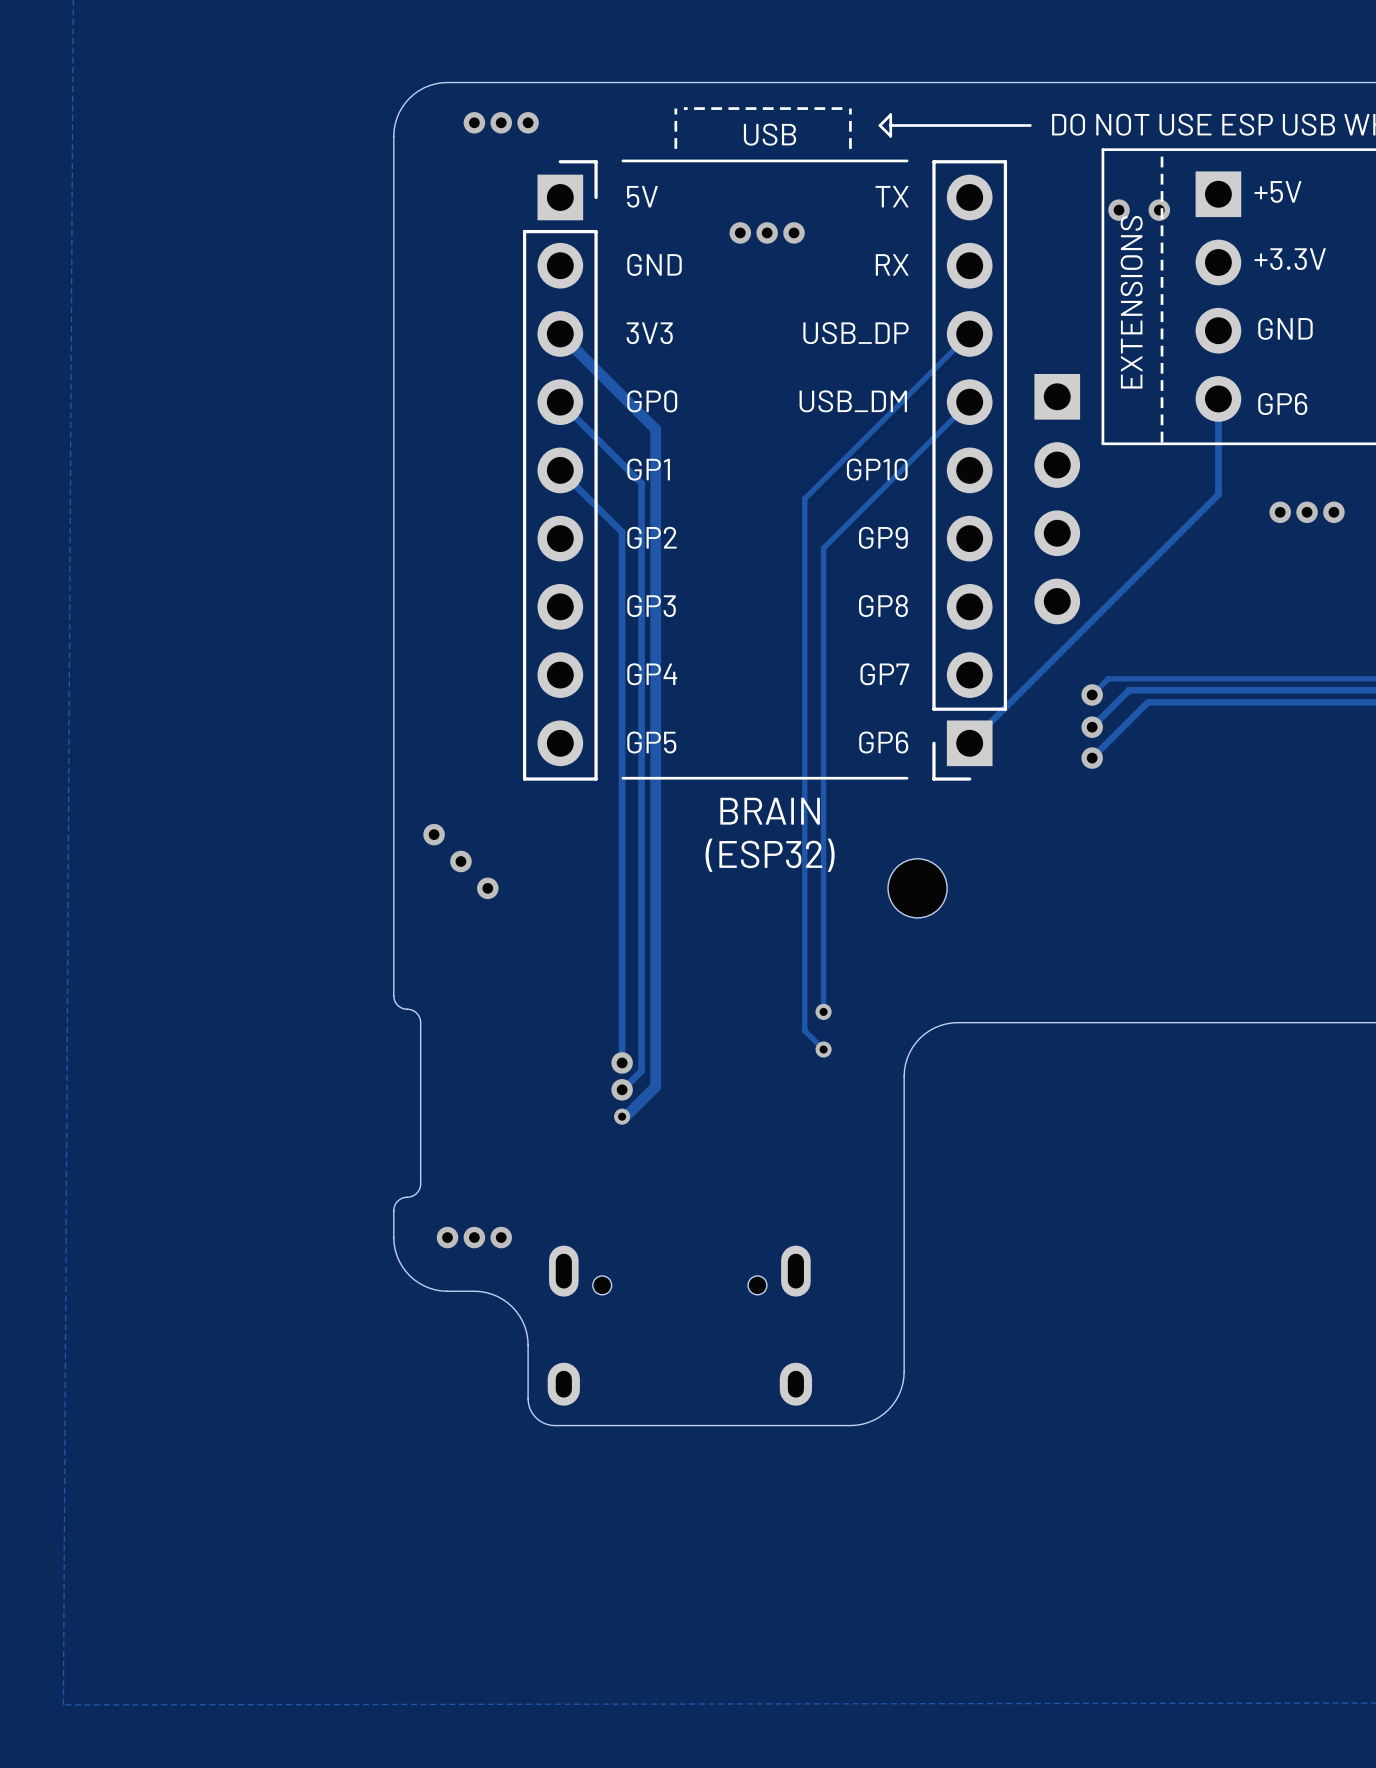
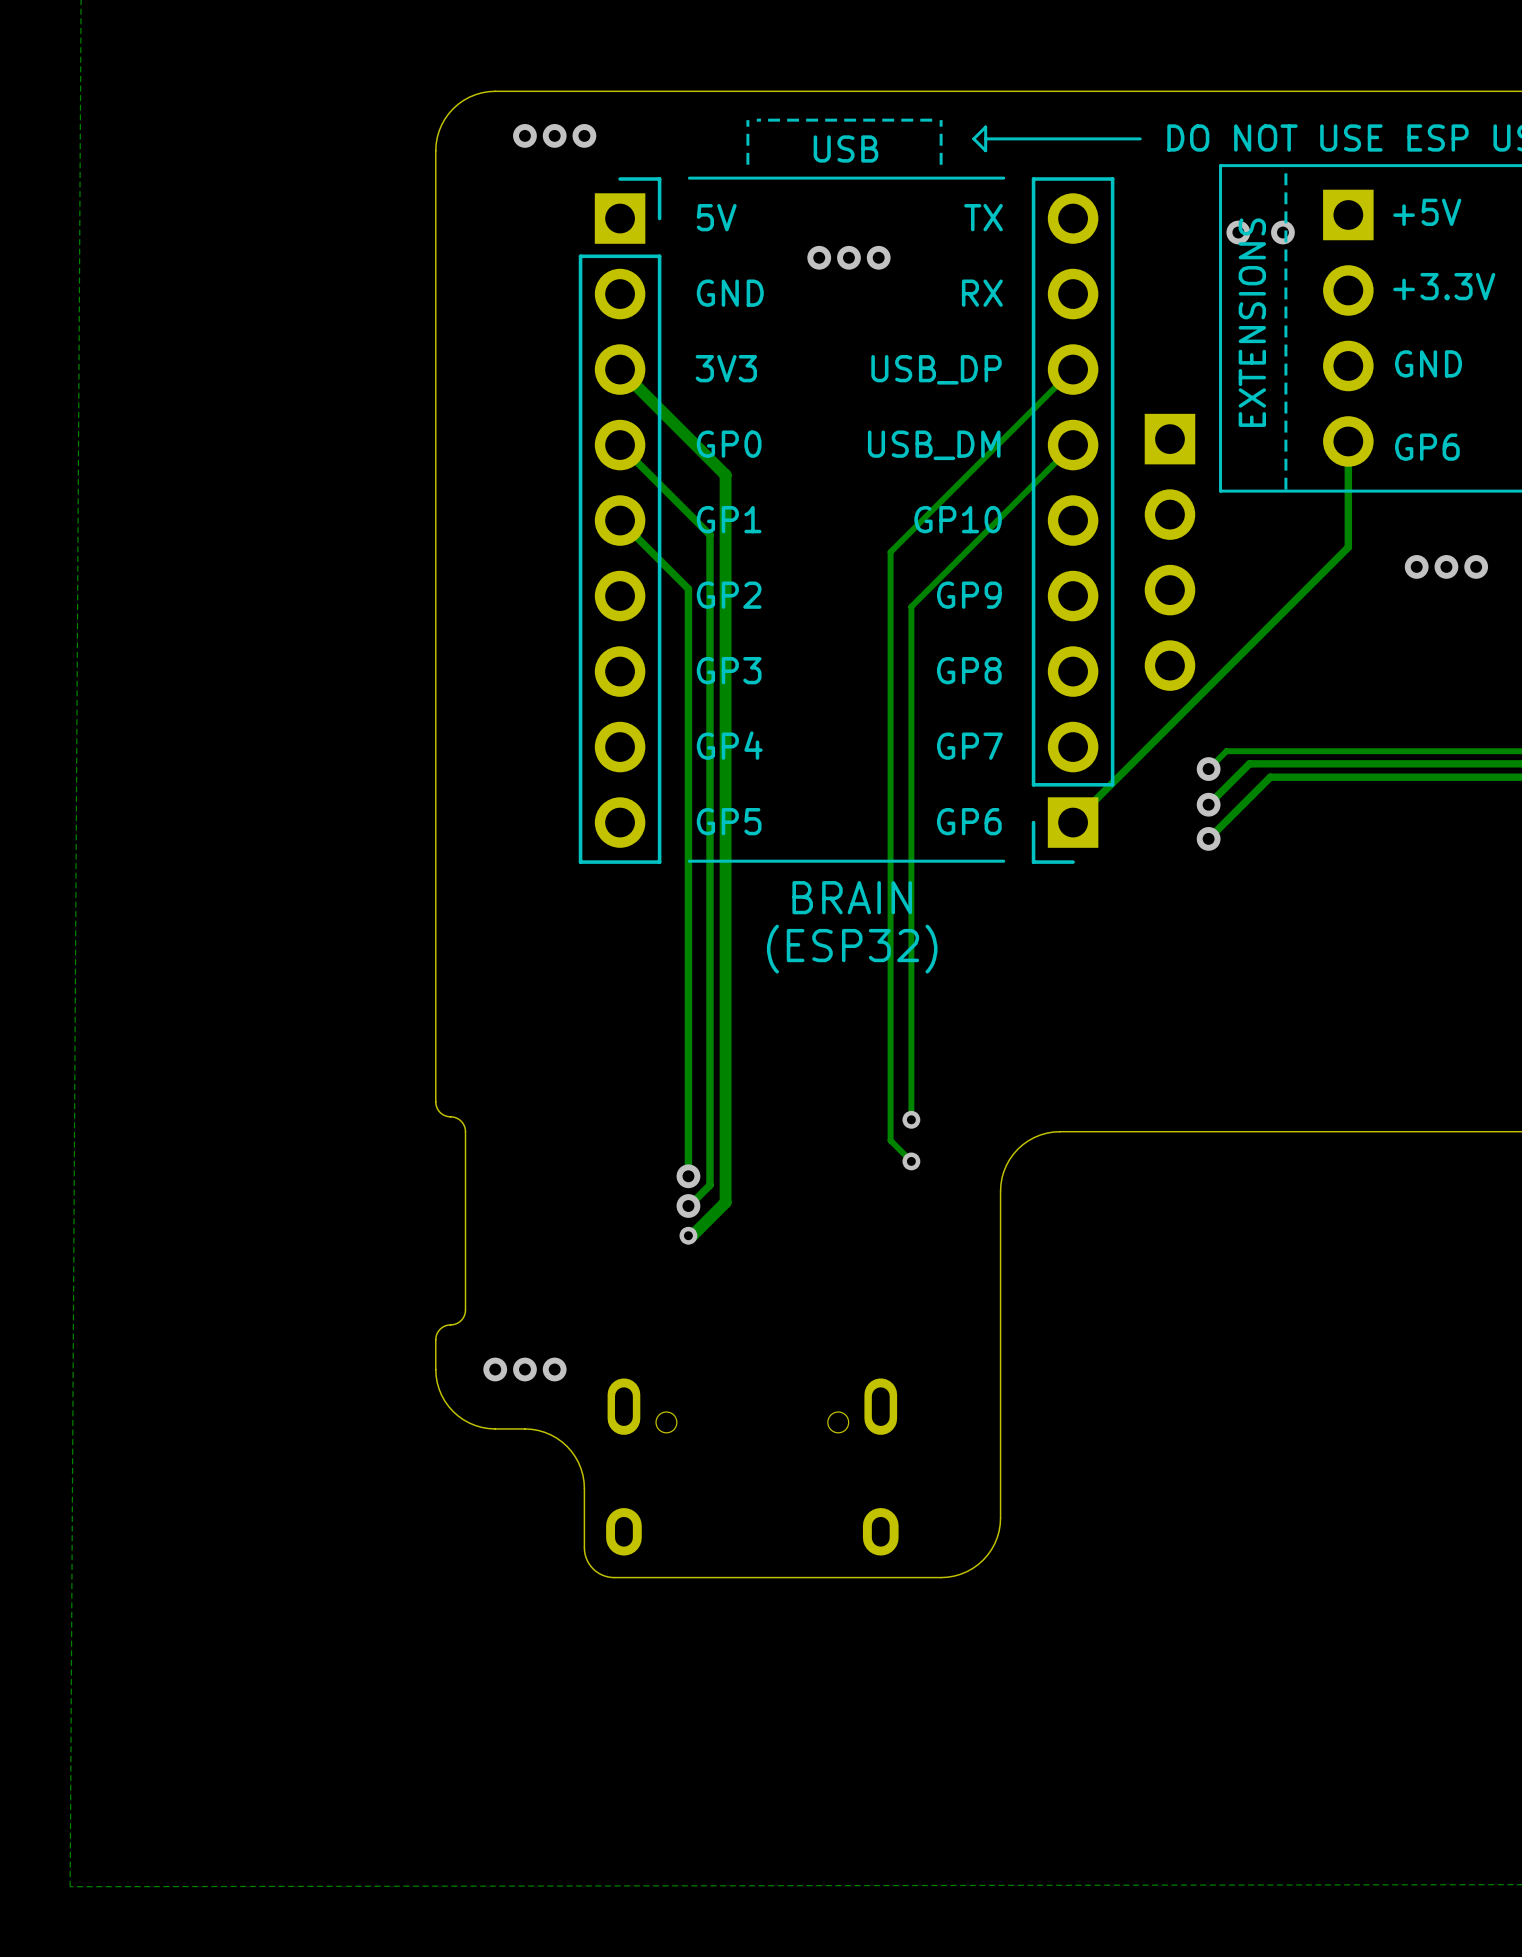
via: (434, 834) -> none
via: (460, 861) -> none
via: (487, 888) -> none
part: (917, 888) -> none

